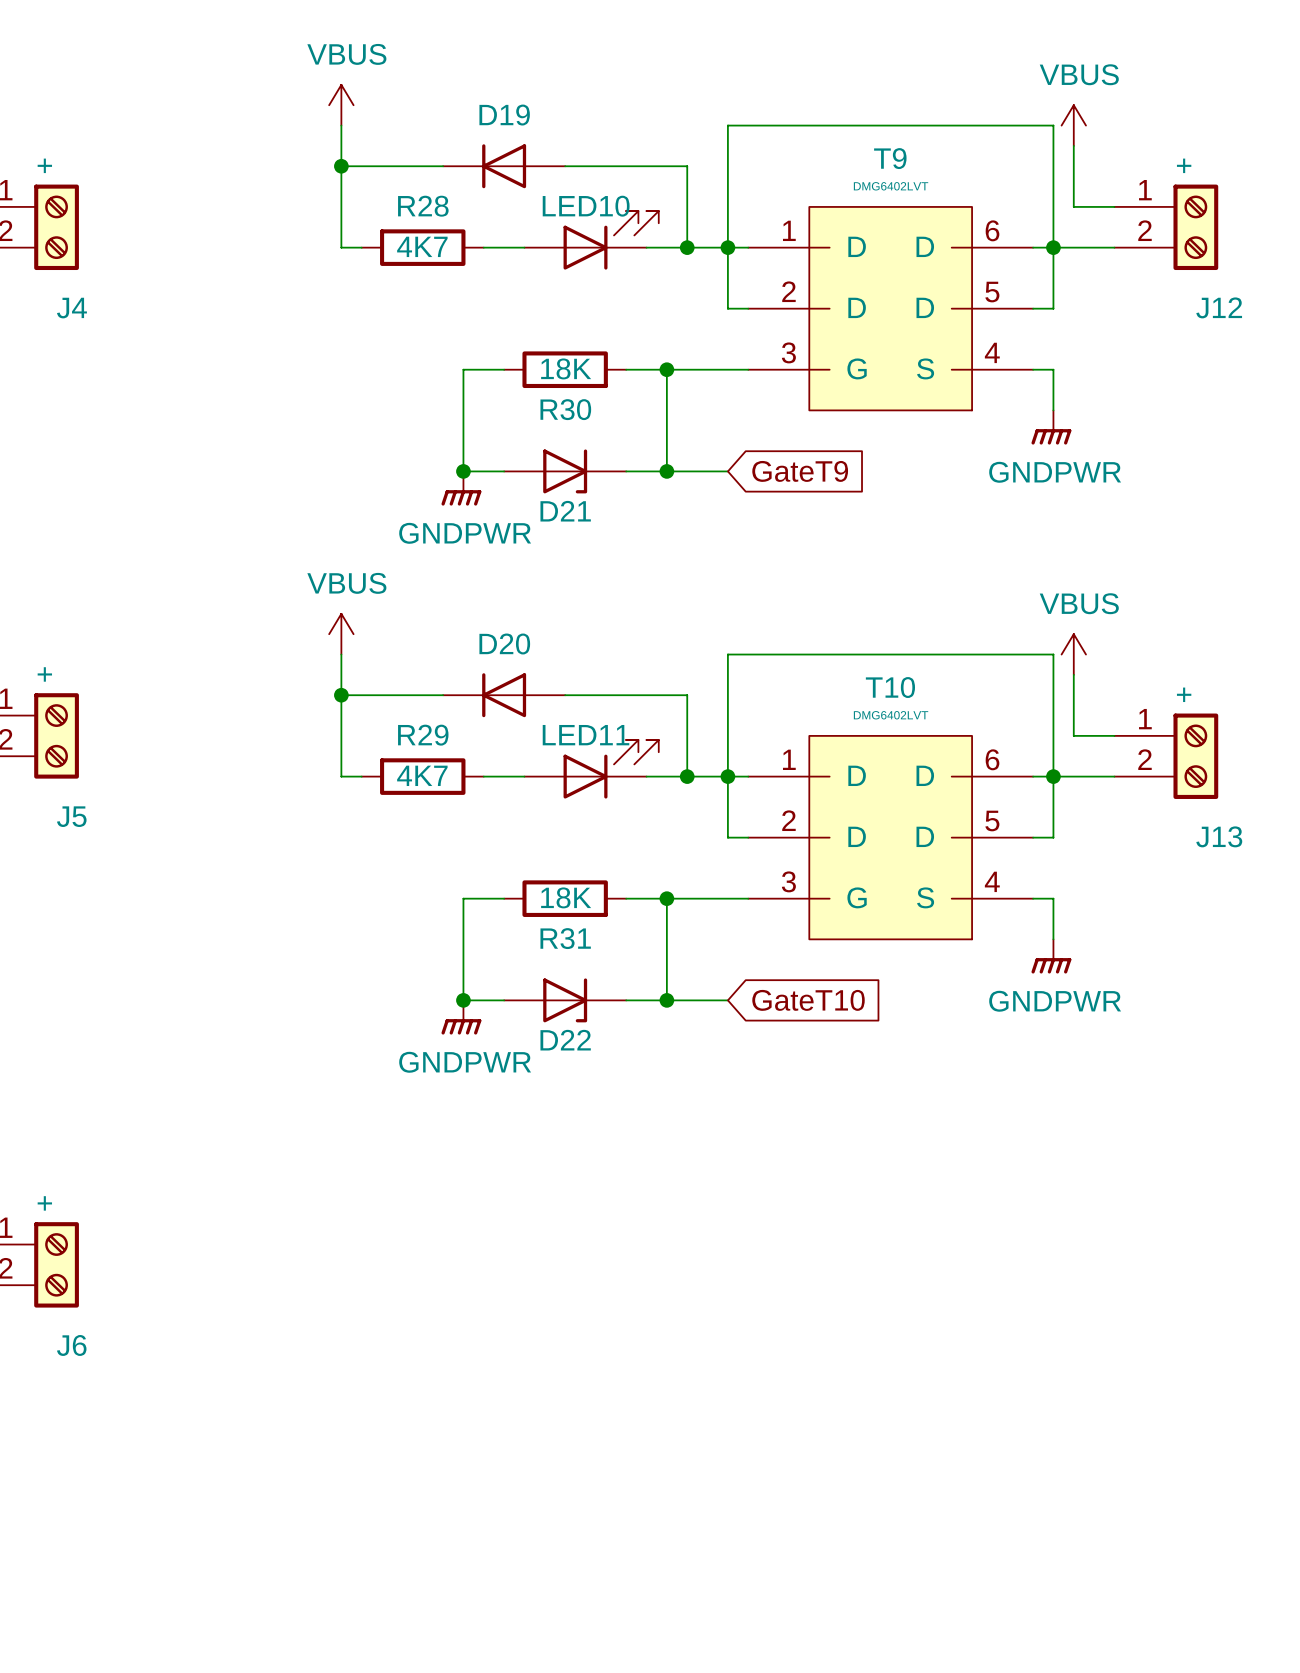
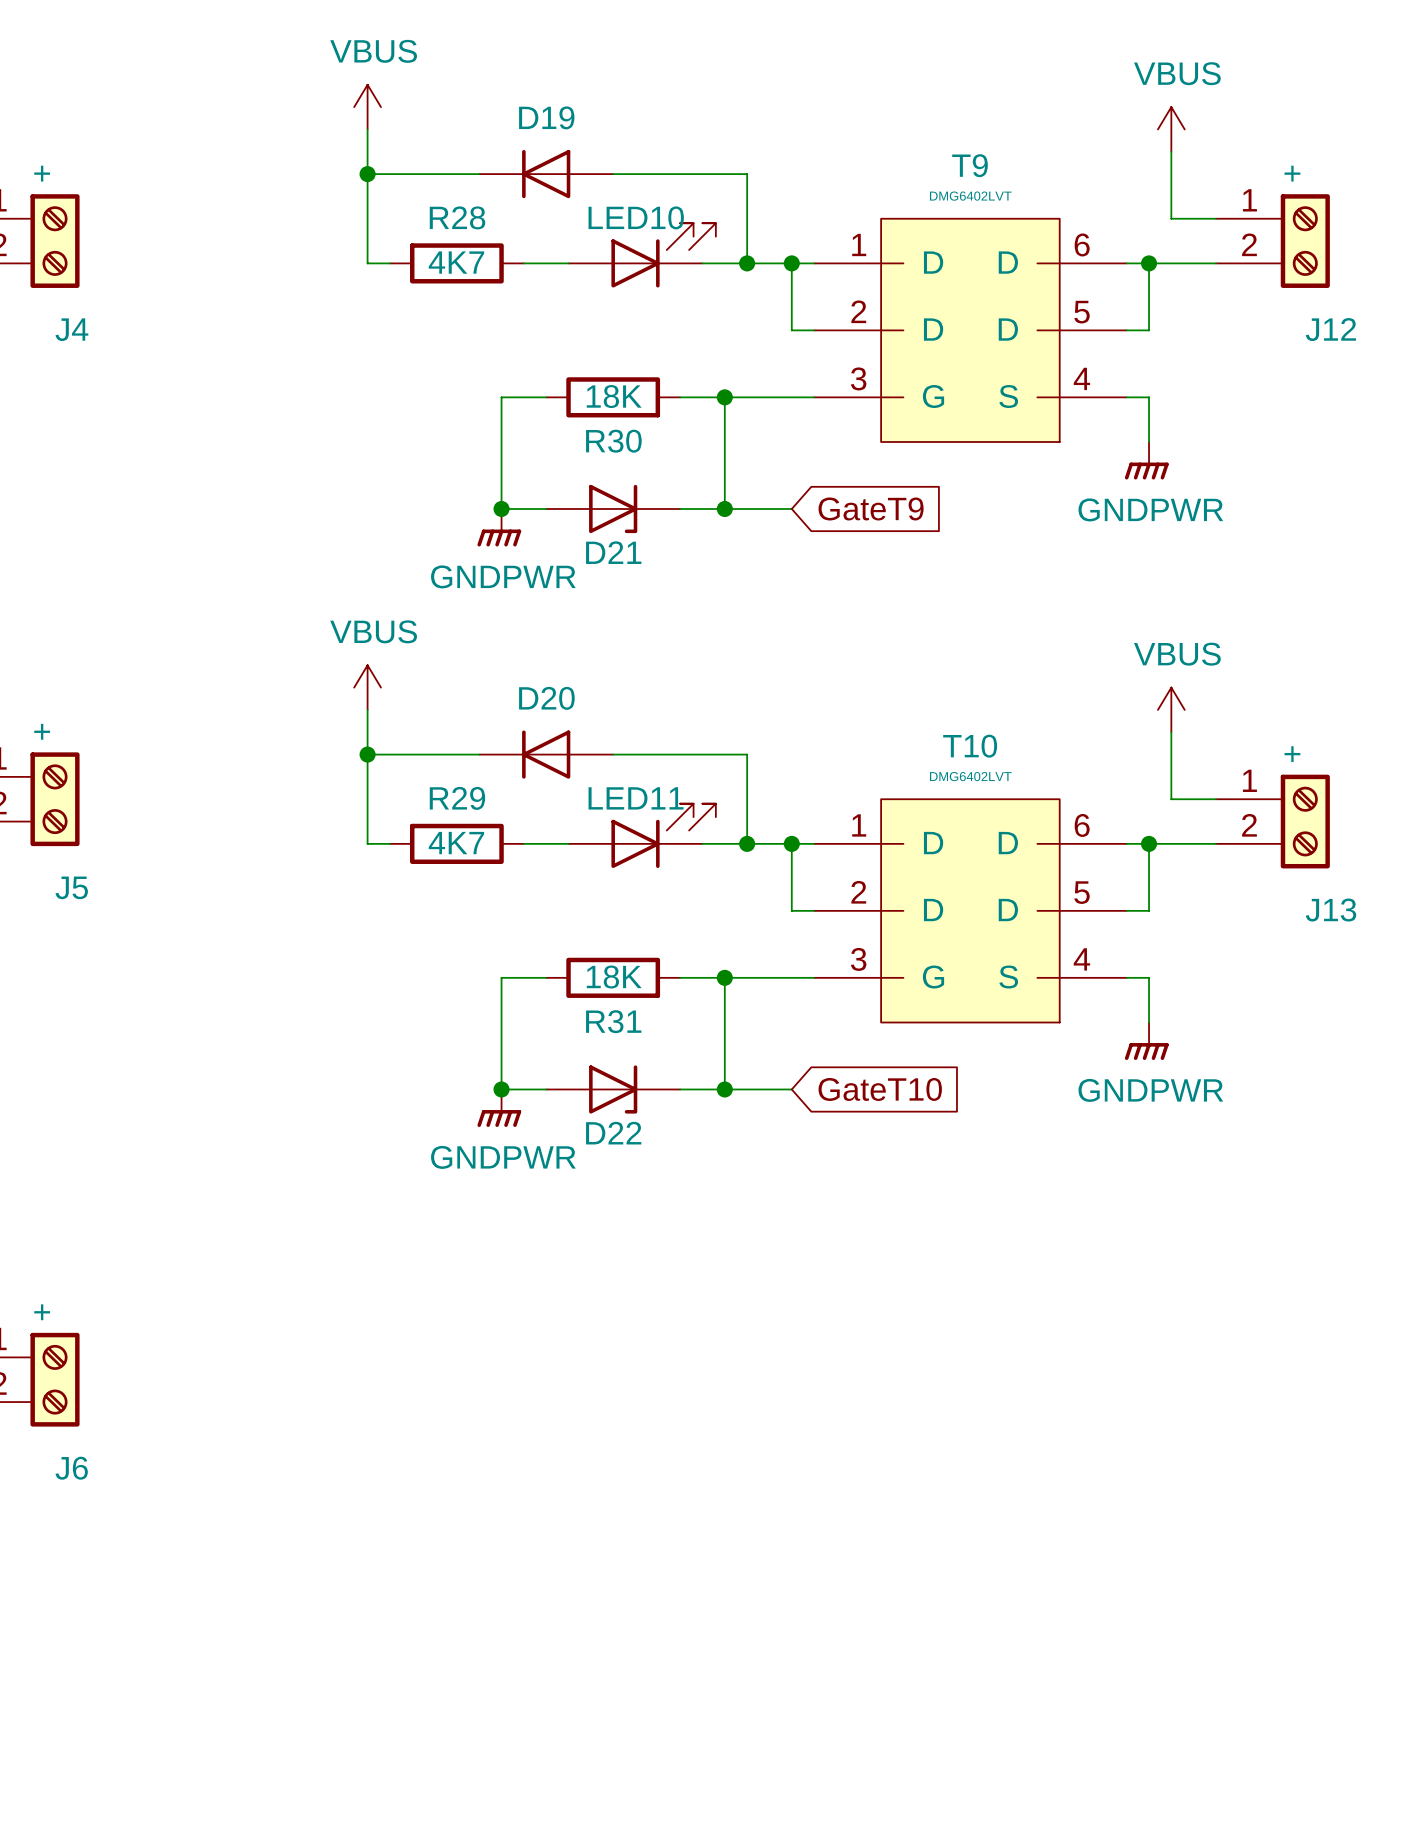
wire: (727, 247) (727, 125) (1053, 125) (1053, 247) -> none
wire: (727, 776) (727, 654) (1053, 654) (1053, 776) -> none

